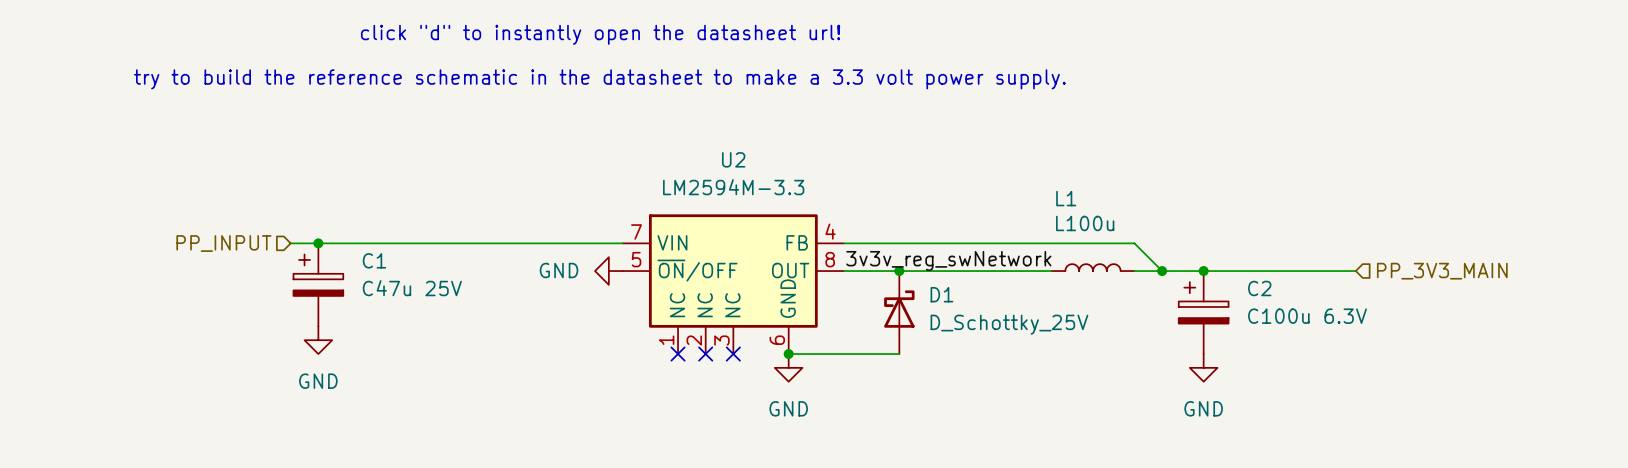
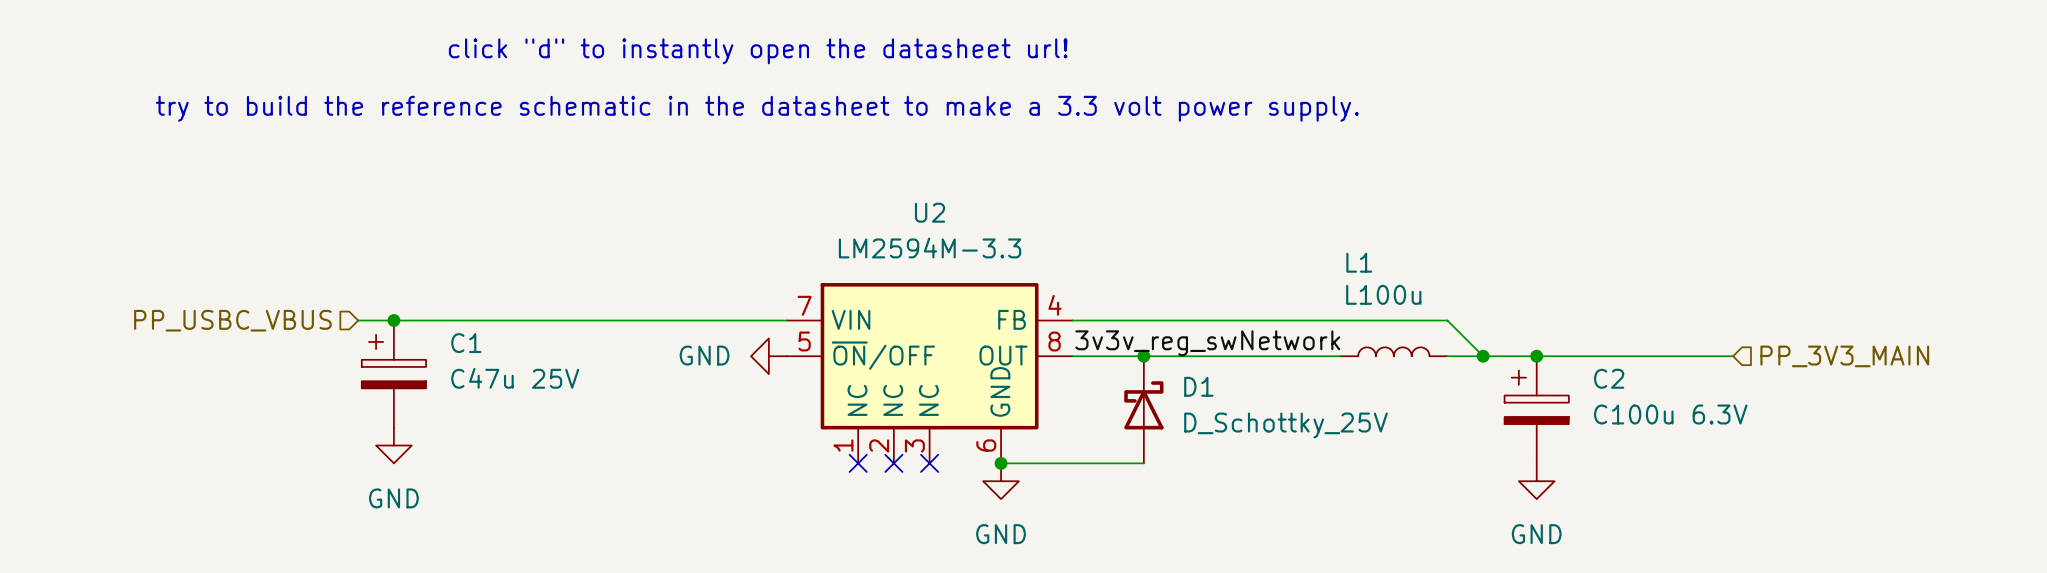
hierarchical label: PP_INPUT (223, 243) -> PP_USBC_VBUS (232, 320)

